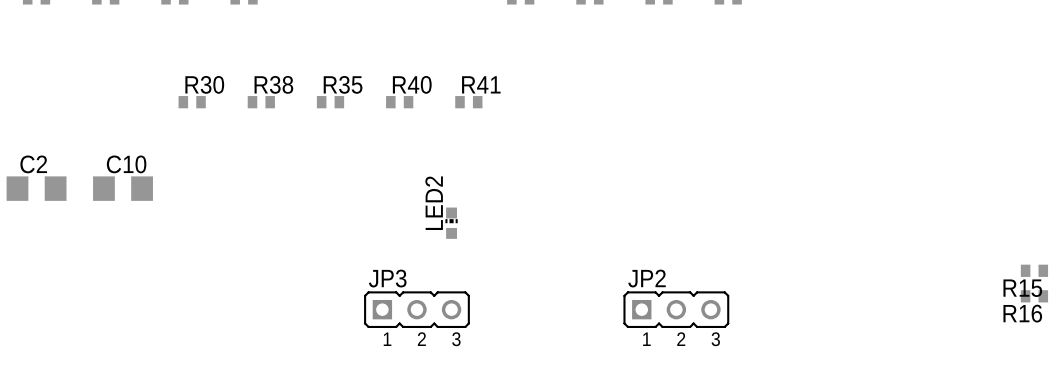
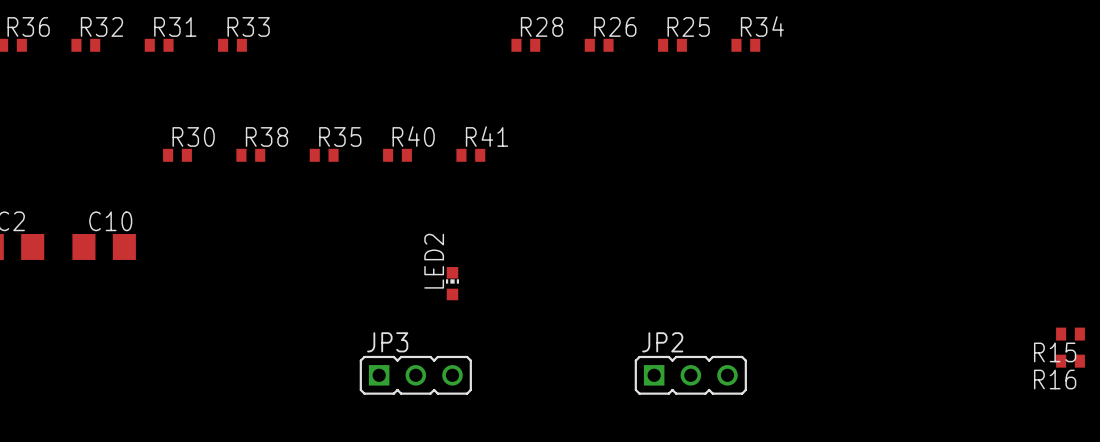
JP3 text: 1 (387, 339) -> none
JP3 text: 2 (421, 339) -> none
JP3 text: 3 (456, 339) -> none
JP2 text: 1 (646, 339) -> none
JP2 text: 2 (681, 339) -> none
JP2 text: 3 (715, 339) -> none

